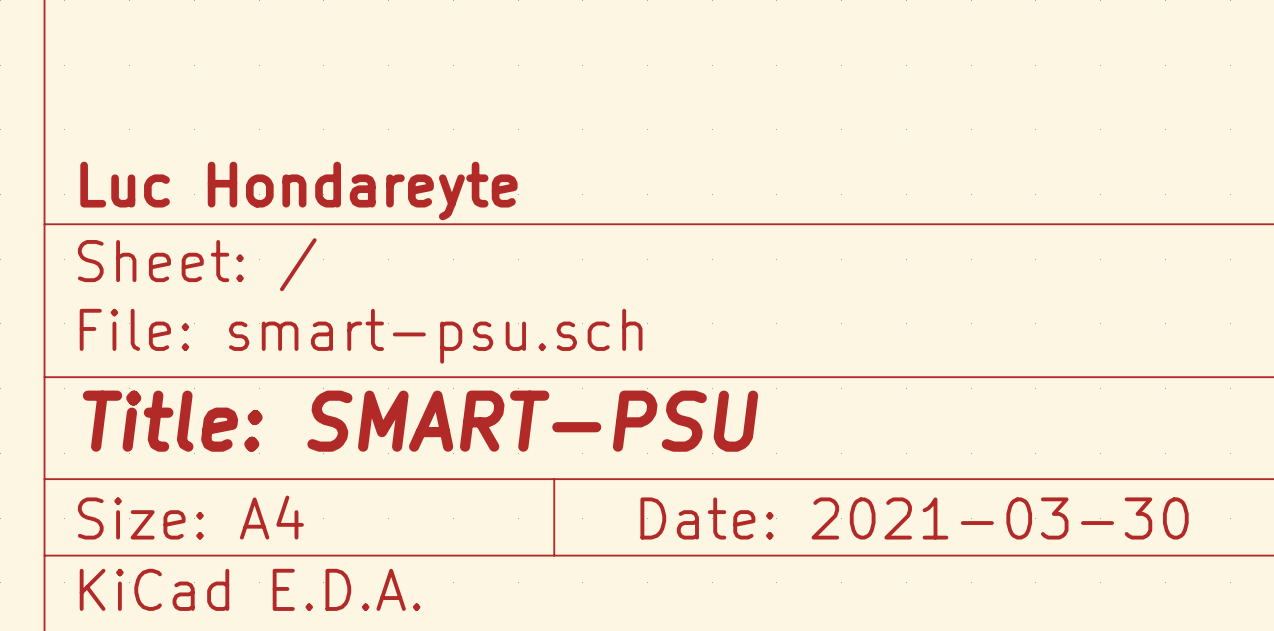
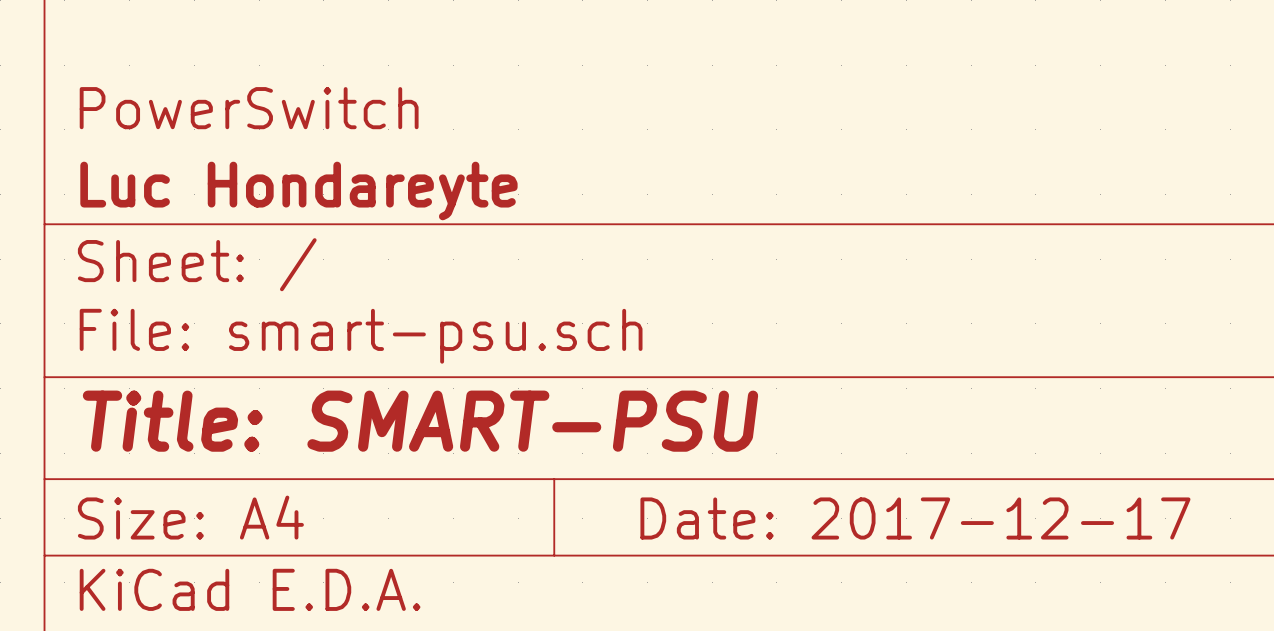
title block: none -> PowerSwitch (249, 108)
title block: Date: 2021-03-30 (914, 518) -> Date: 2017-12-17 (915, 518)

